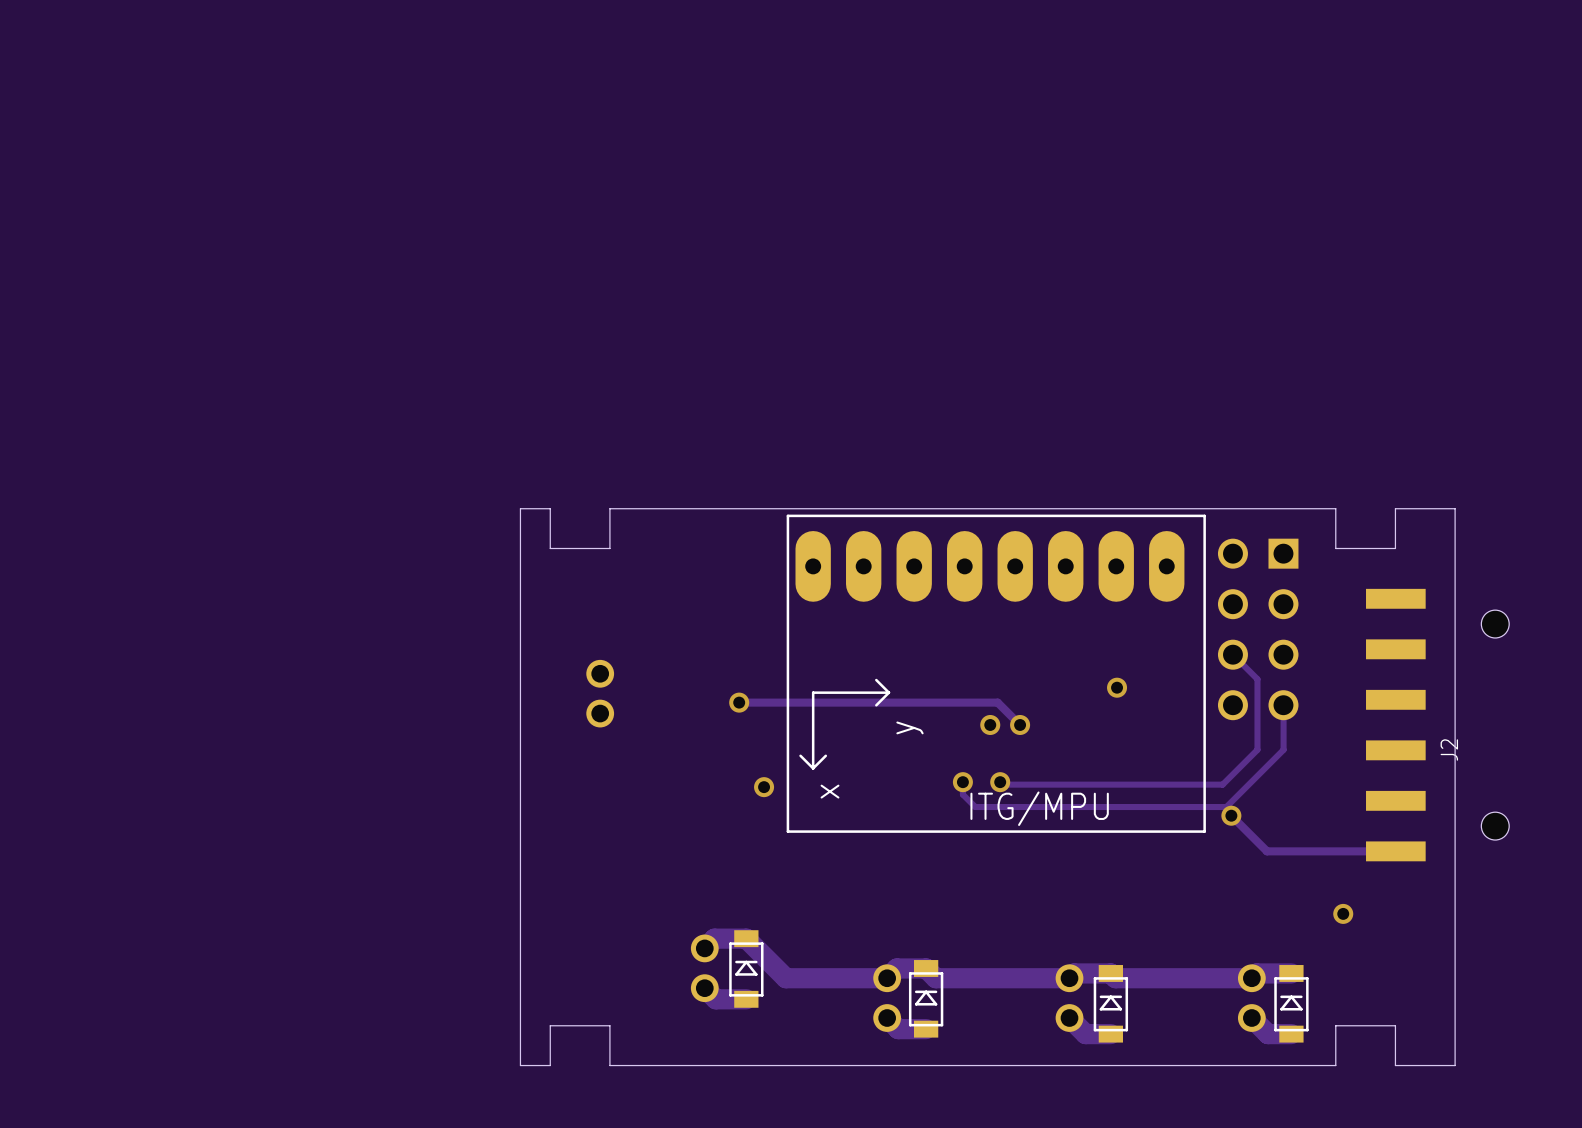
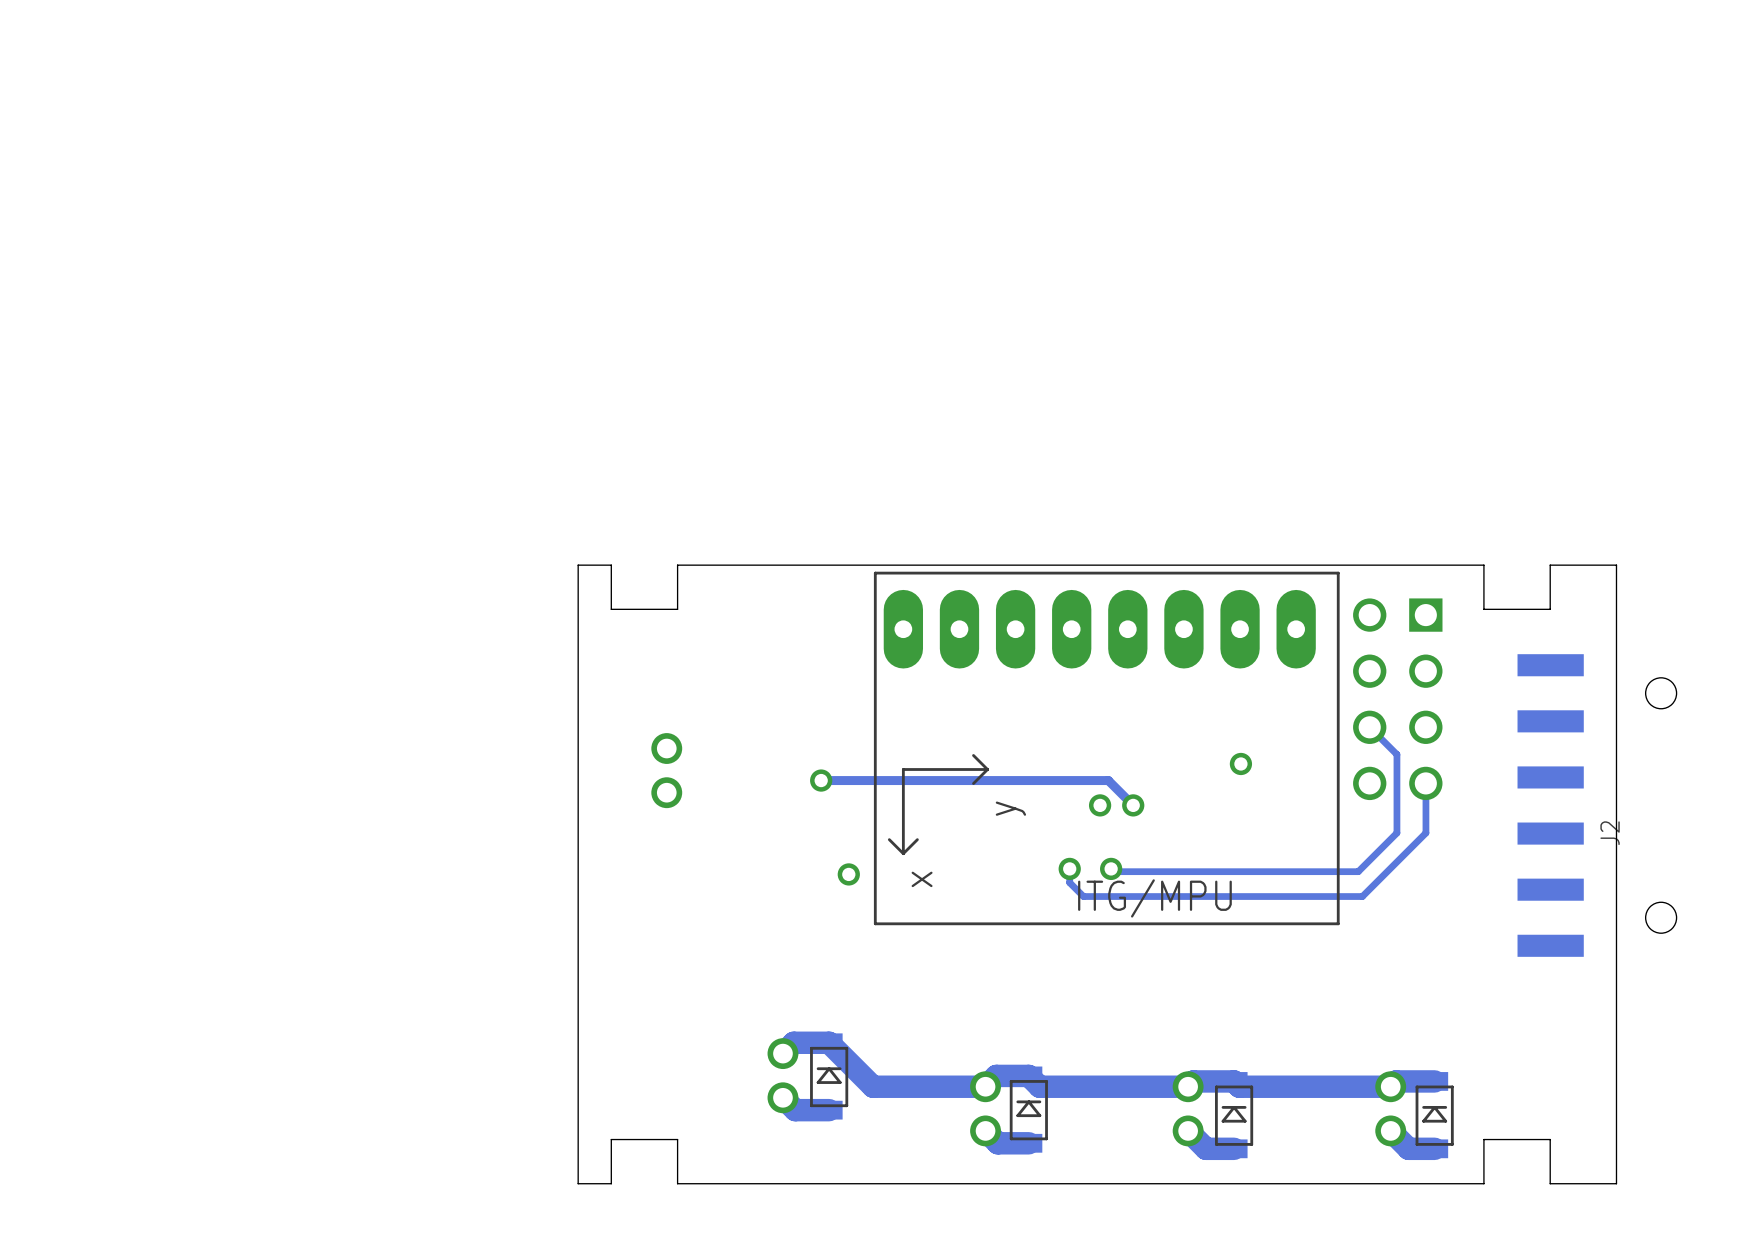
track: (1231, 815) (1267, 851) (1395, 851) -> none
via: (1231, 815) -> none
via: (1343, 913) -> none

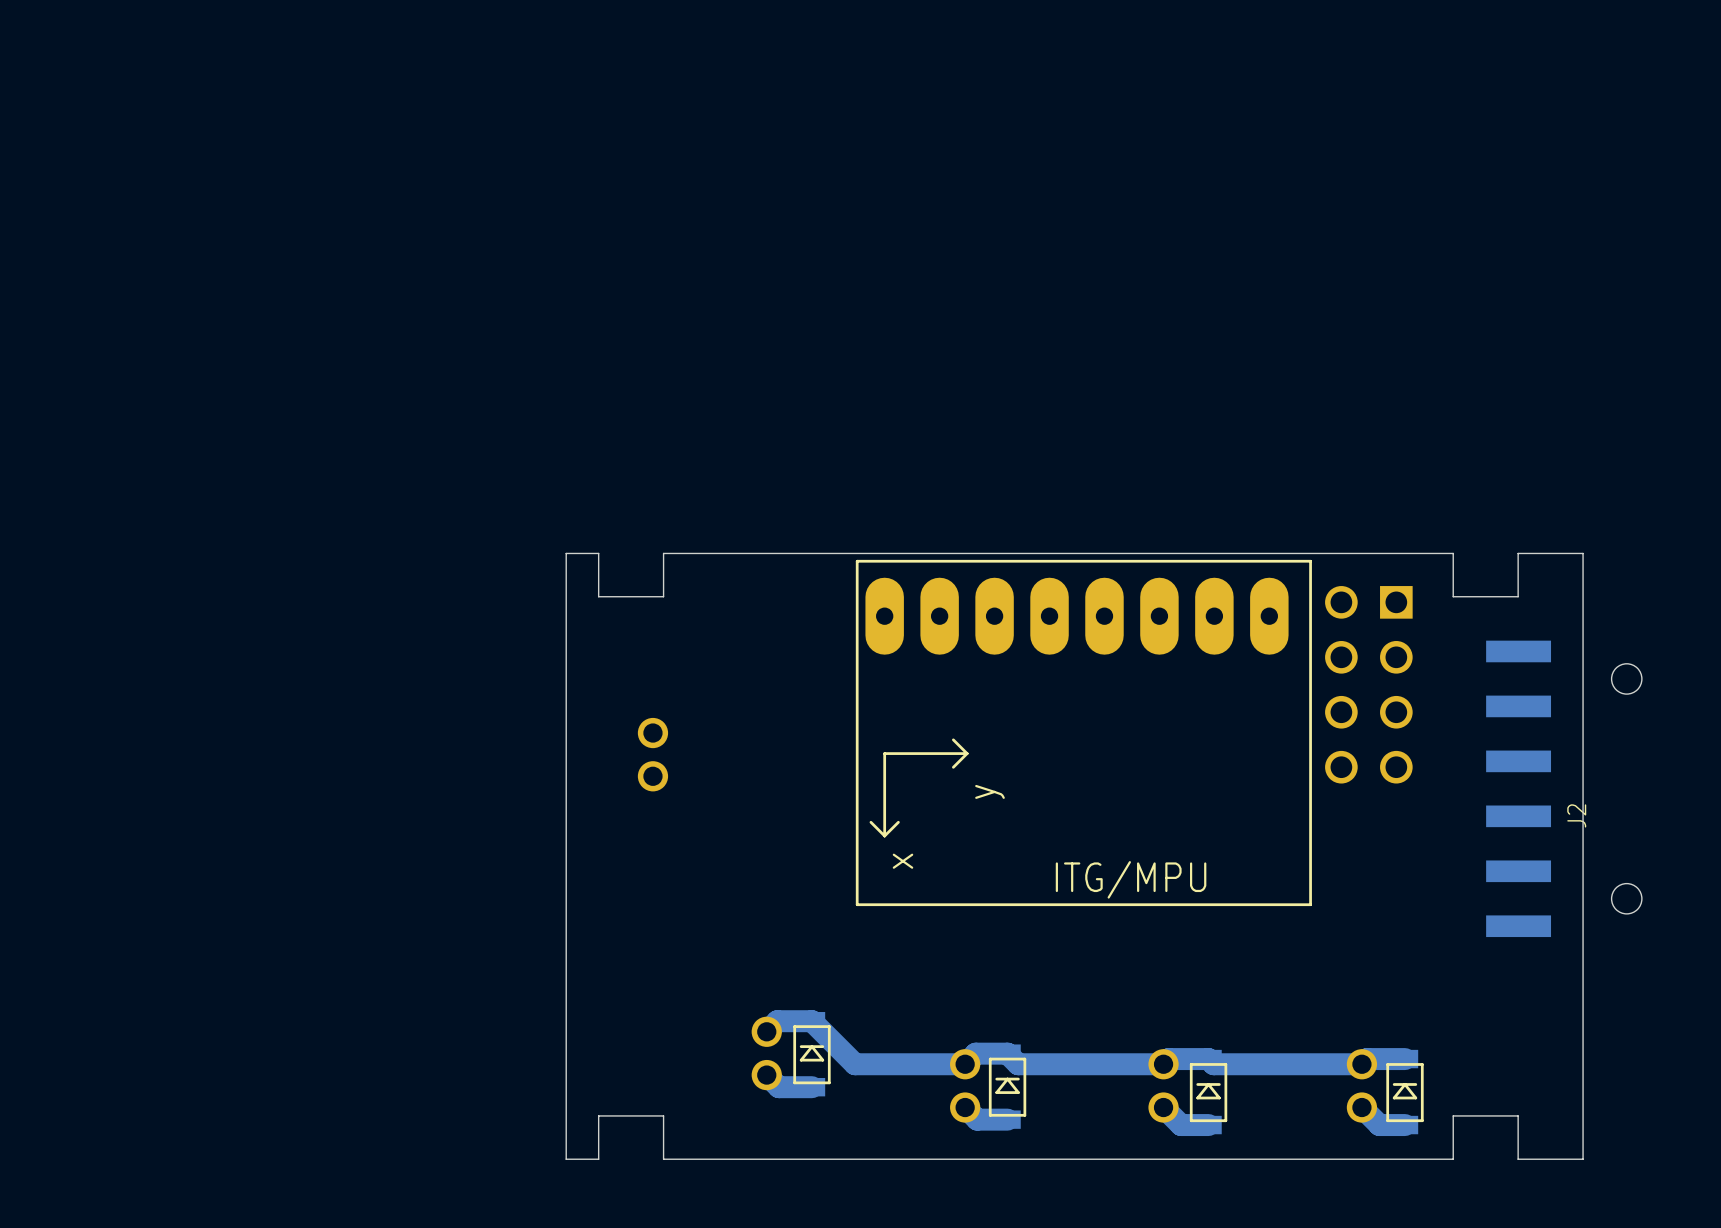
track: (1369, 727) (1396, 754) (1396, 833) (1358, 871) (1113, 871) (1111, 868) -> none
via: (1240, 763) -> none
track: (821, 780) (1108, 780) (1133, 805) -> none
via: (821, 780) -> none
track: (1425, 783) (1425, 833) (1362, 896) (1083, 896) (1069, 882) (1069, 868) -> none
via: (1100, 805) -> none
via: (1133, 805) -> none
via: (1069, 868) -> none
via: (1111, 868) -> none
via: (848, 874) -> none

